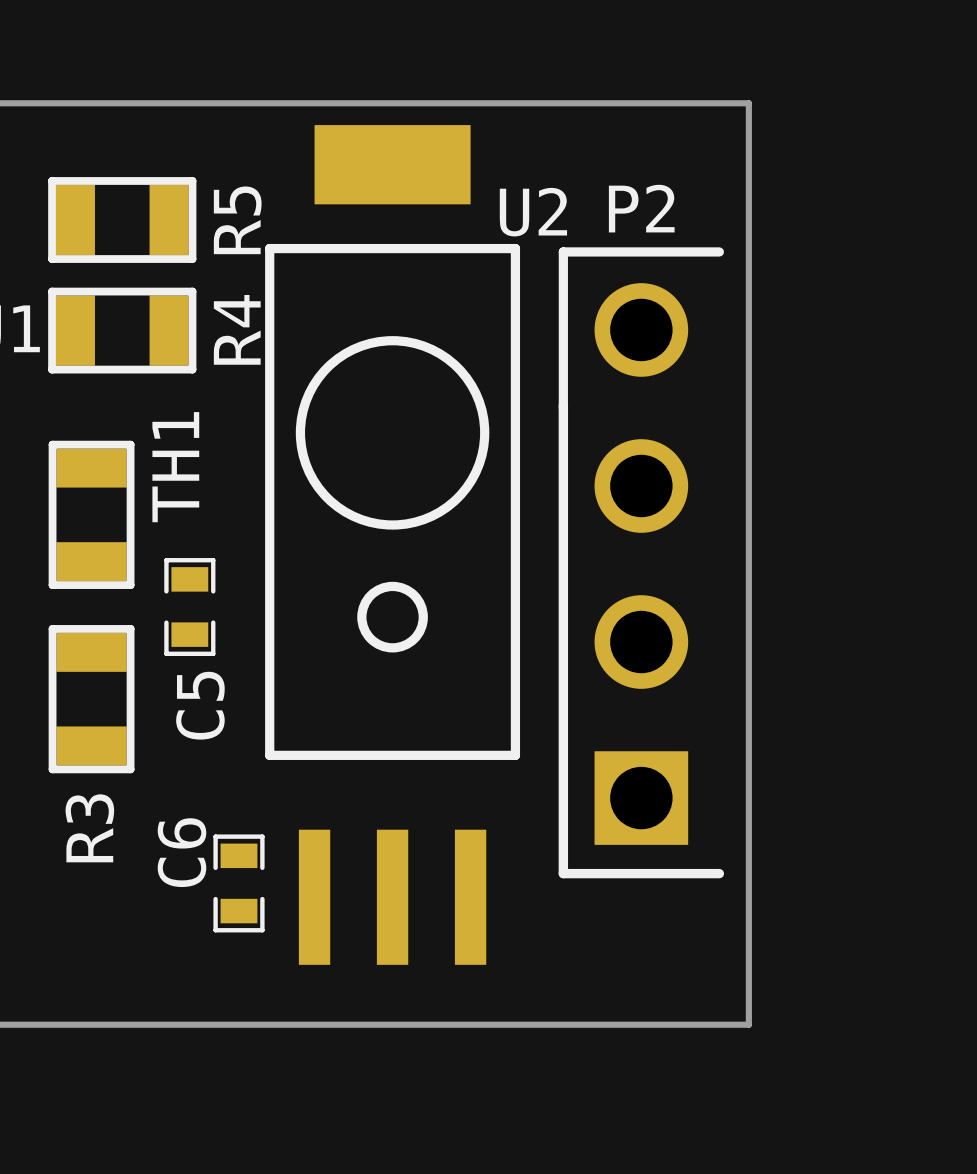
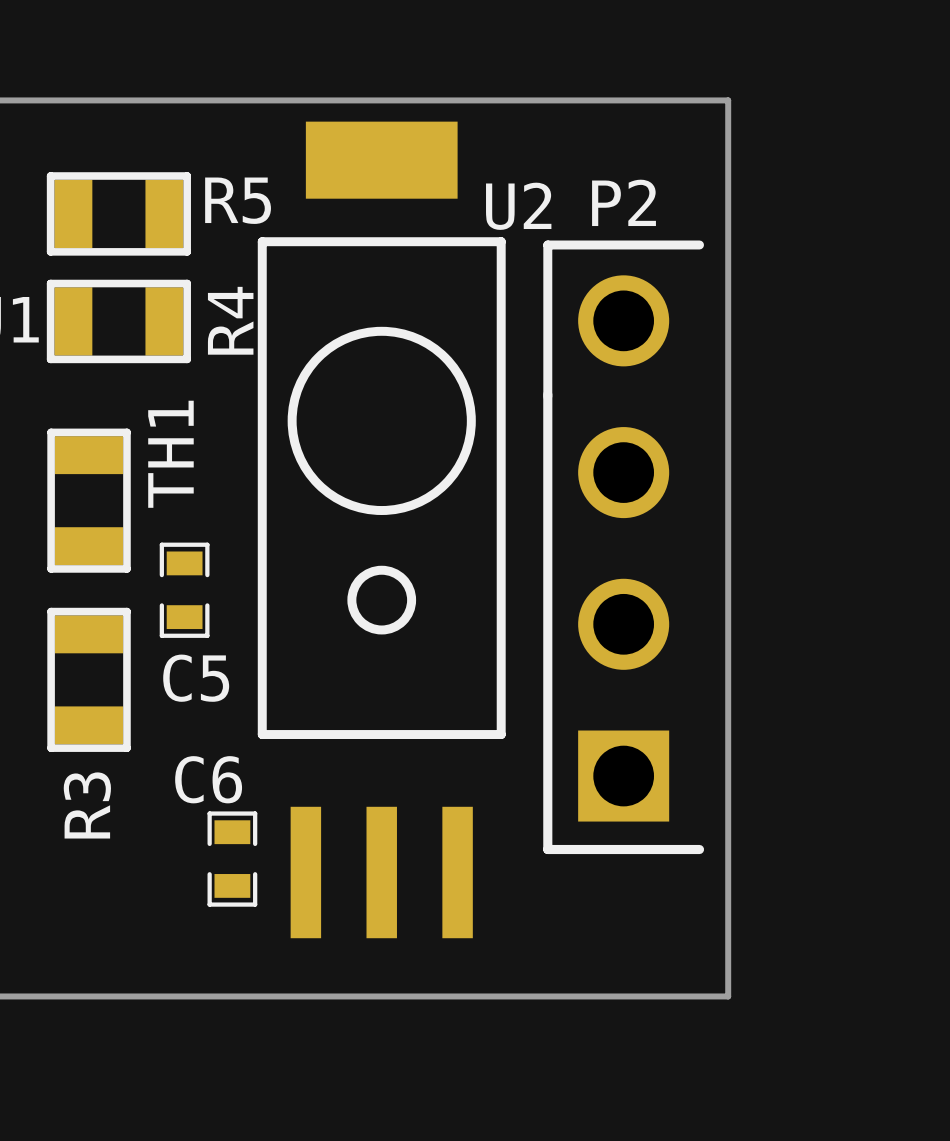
R5 name rotation: 0° (237, 220) -> 90° clockwise (238, 200)
C5 name rotation: 0° (200, 705) -> 90° clockwise (196, 678)
C6 name rotation: 0° (181, 852) -> 90° clockwise (208, 779)

